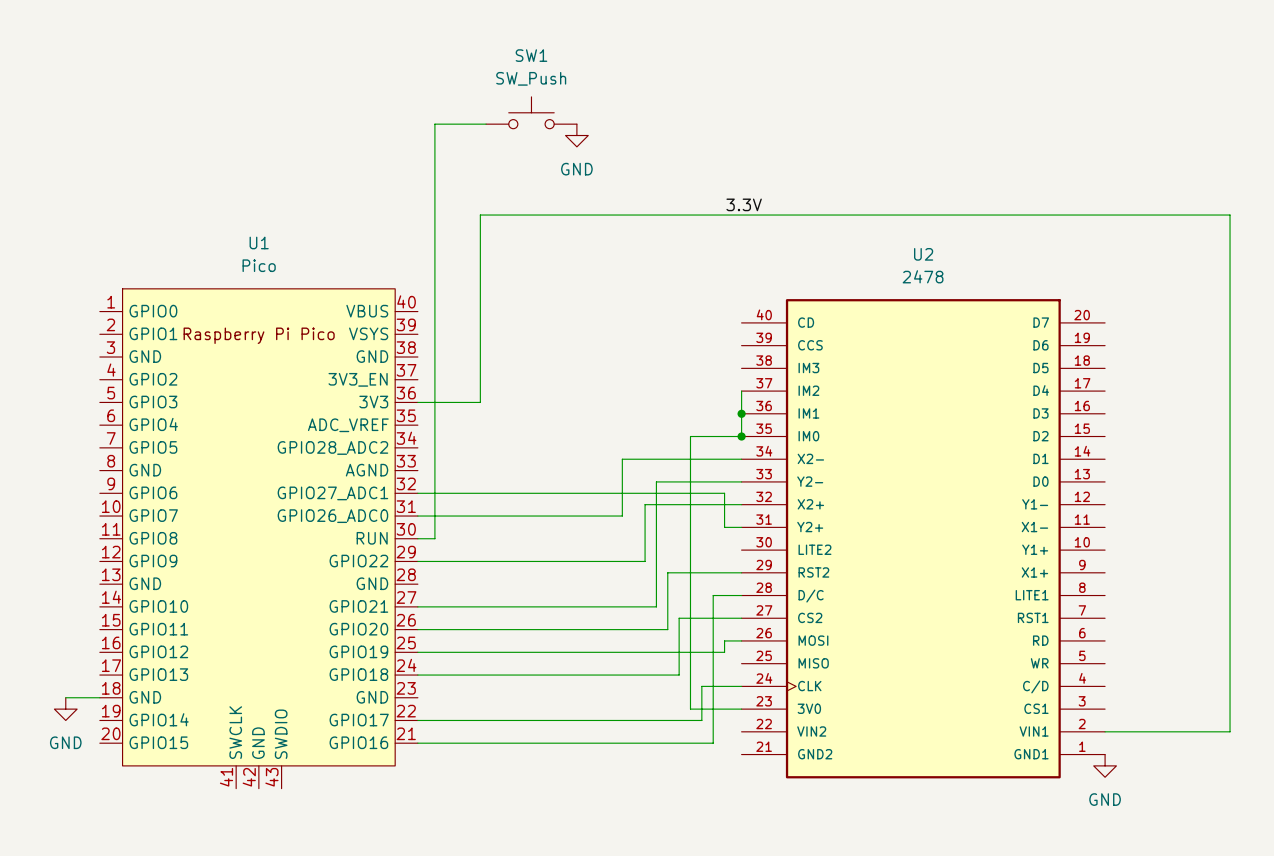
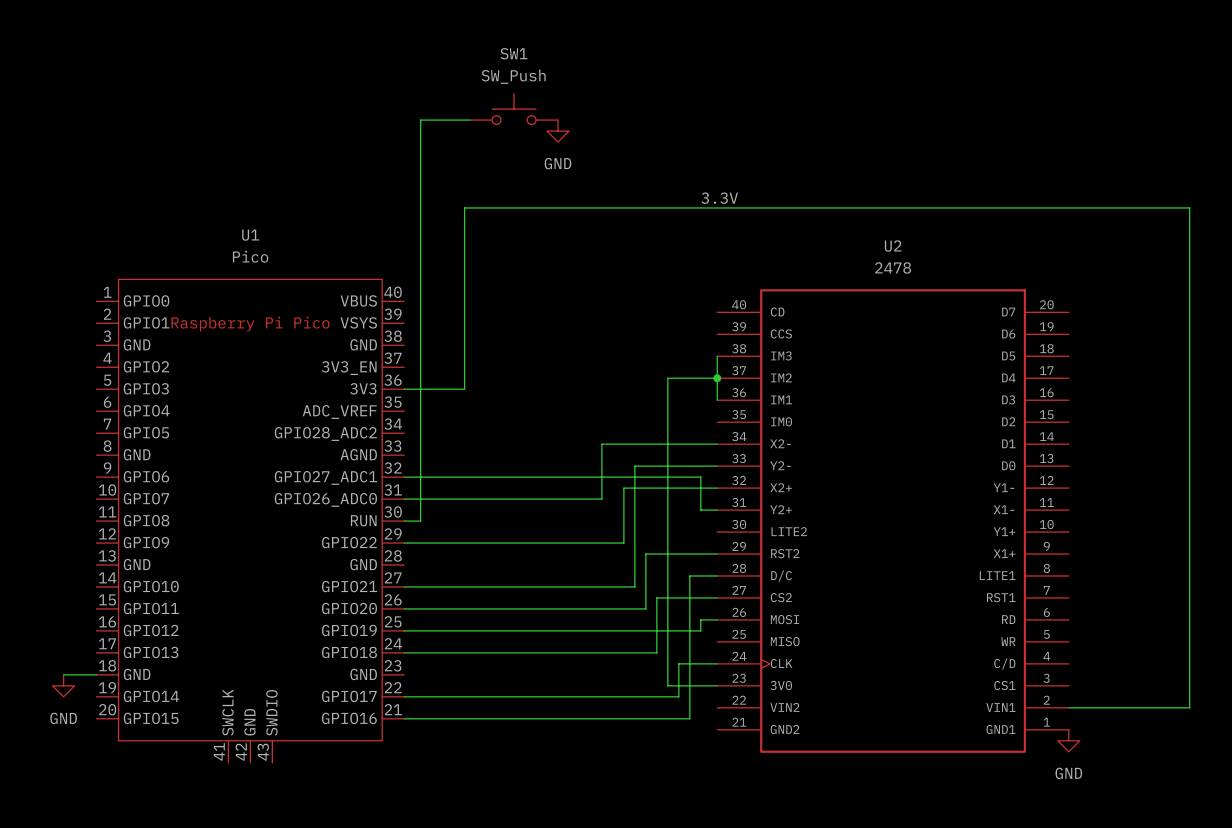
junction: none -> (717, 378)
wire: (741, 413) (741, 436) (690, 436) -> (717, 356) (717, 378) (667, 378) (667, 422)
junction: (741, 413) -> none
junction: (741, 436) -> none

